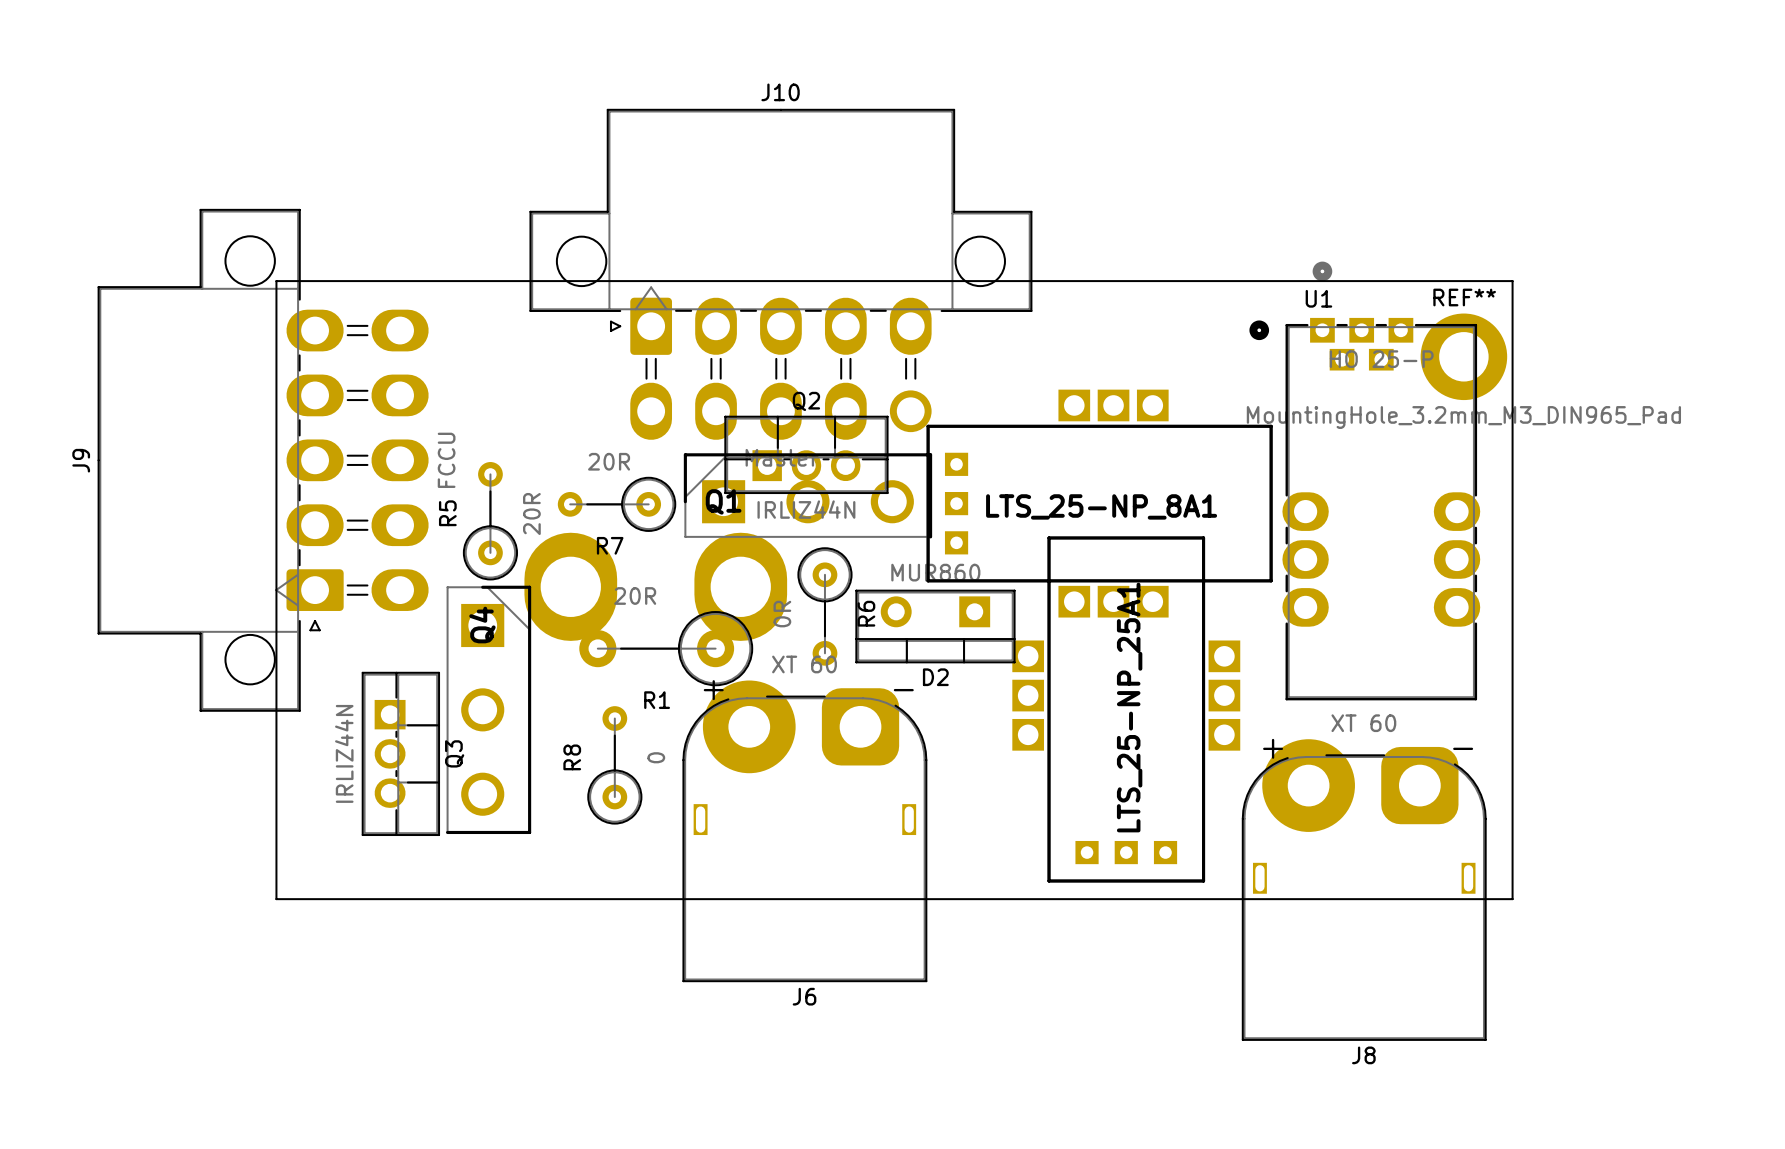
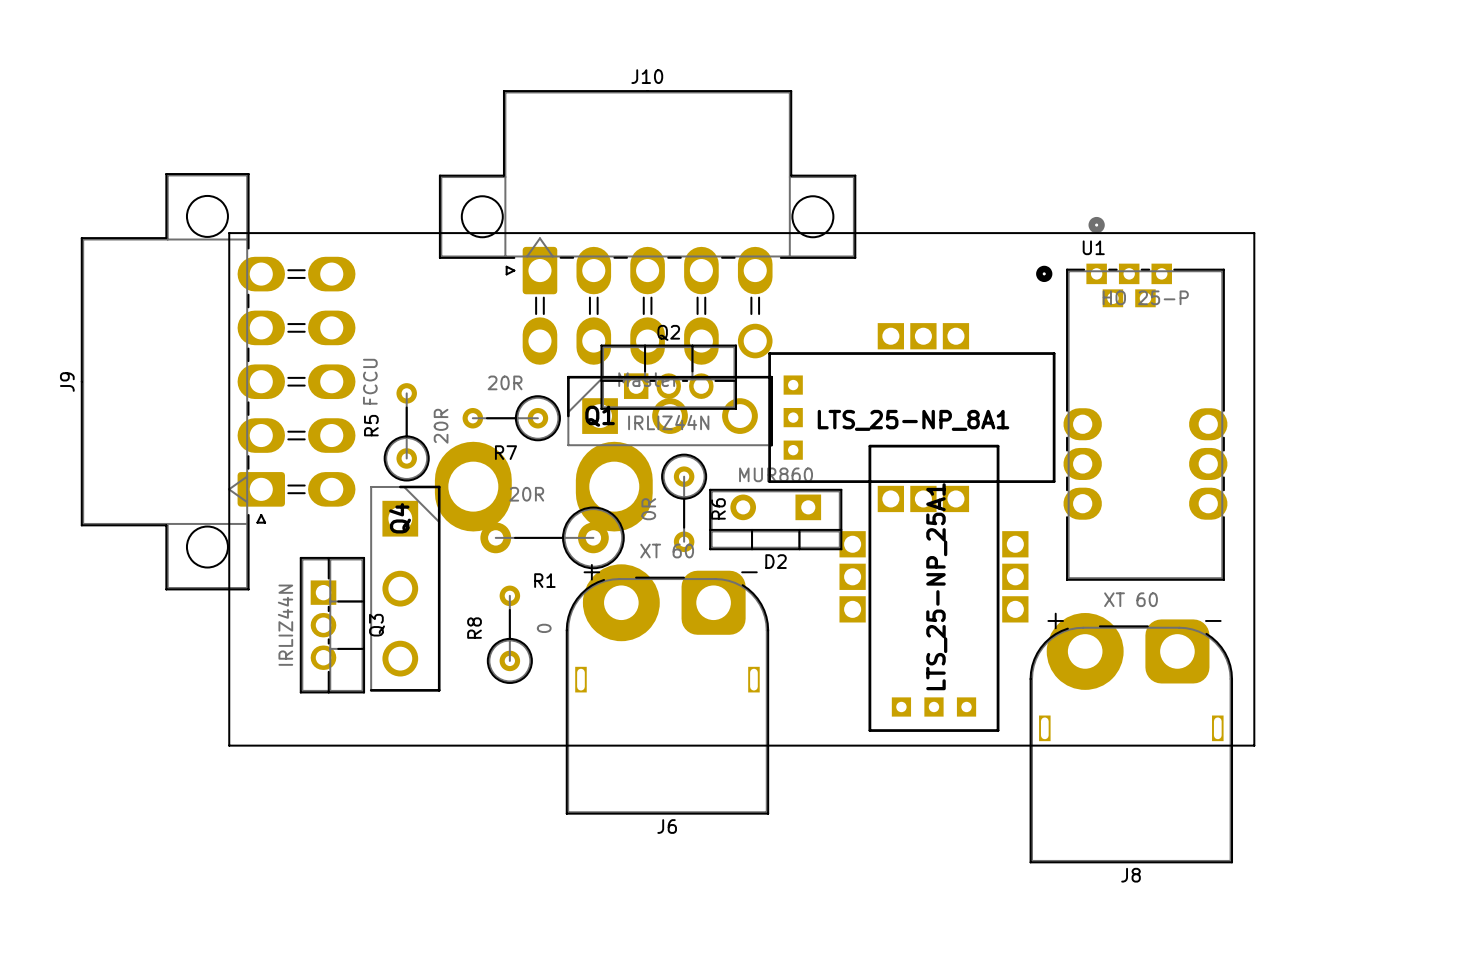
REF**: MountingHole_3.2mm_M3_DIN965_Pad (1463, 356) -> none

